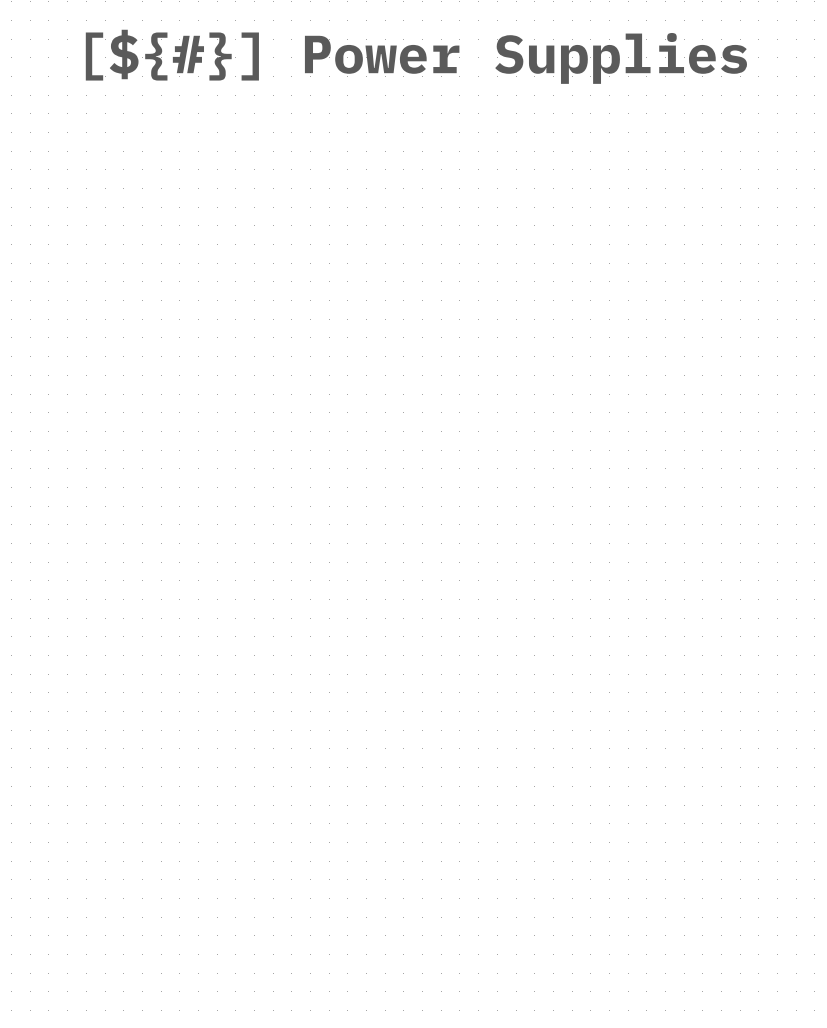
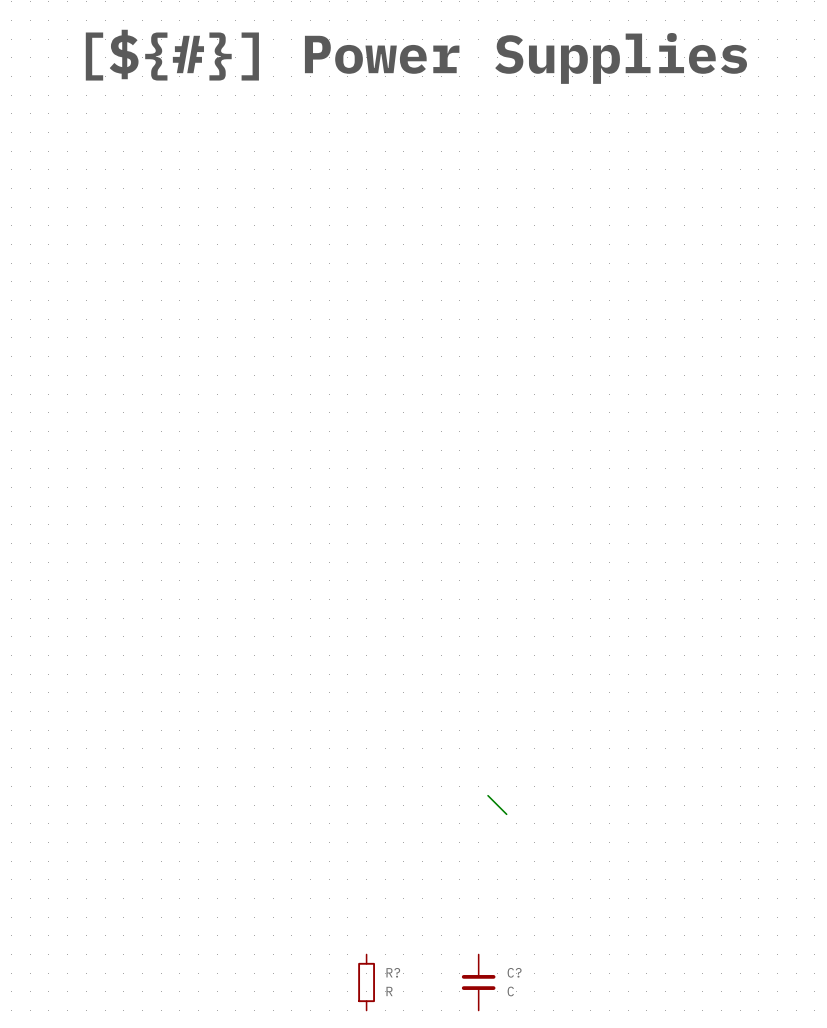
wire: none -> (488, 795) (506, 814)
R?: none -> R (366, 982)
C?: none -> C (478, 982)

